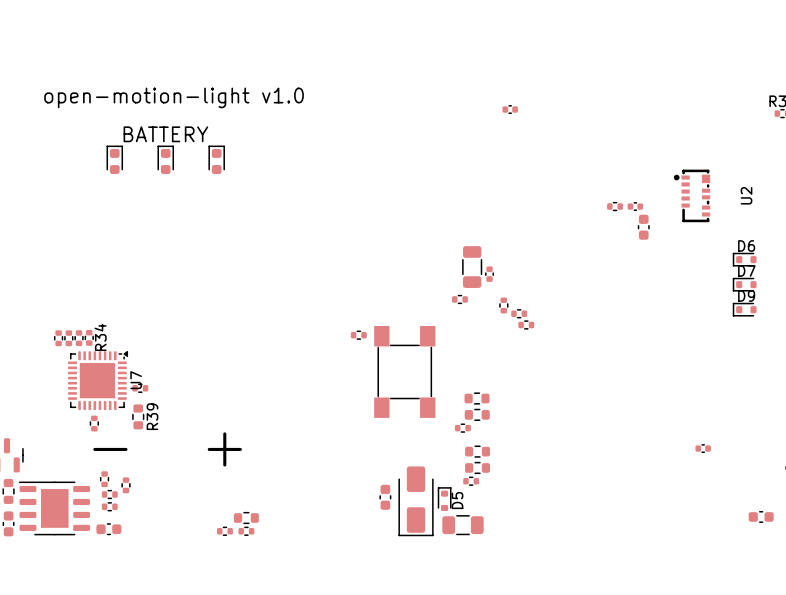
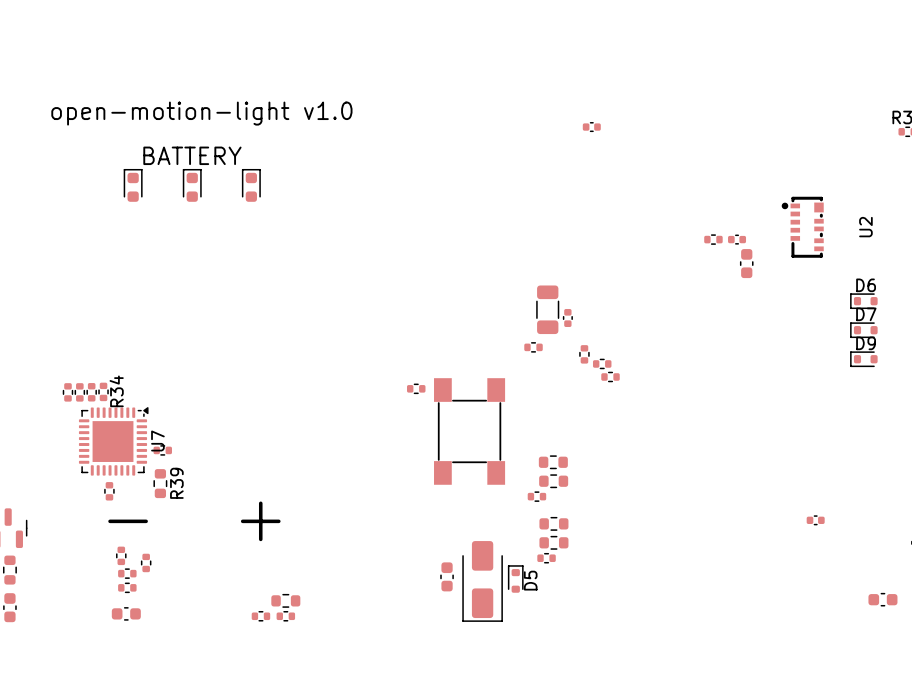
part: (54, 508) -> none
part: (463, 525) -> none

